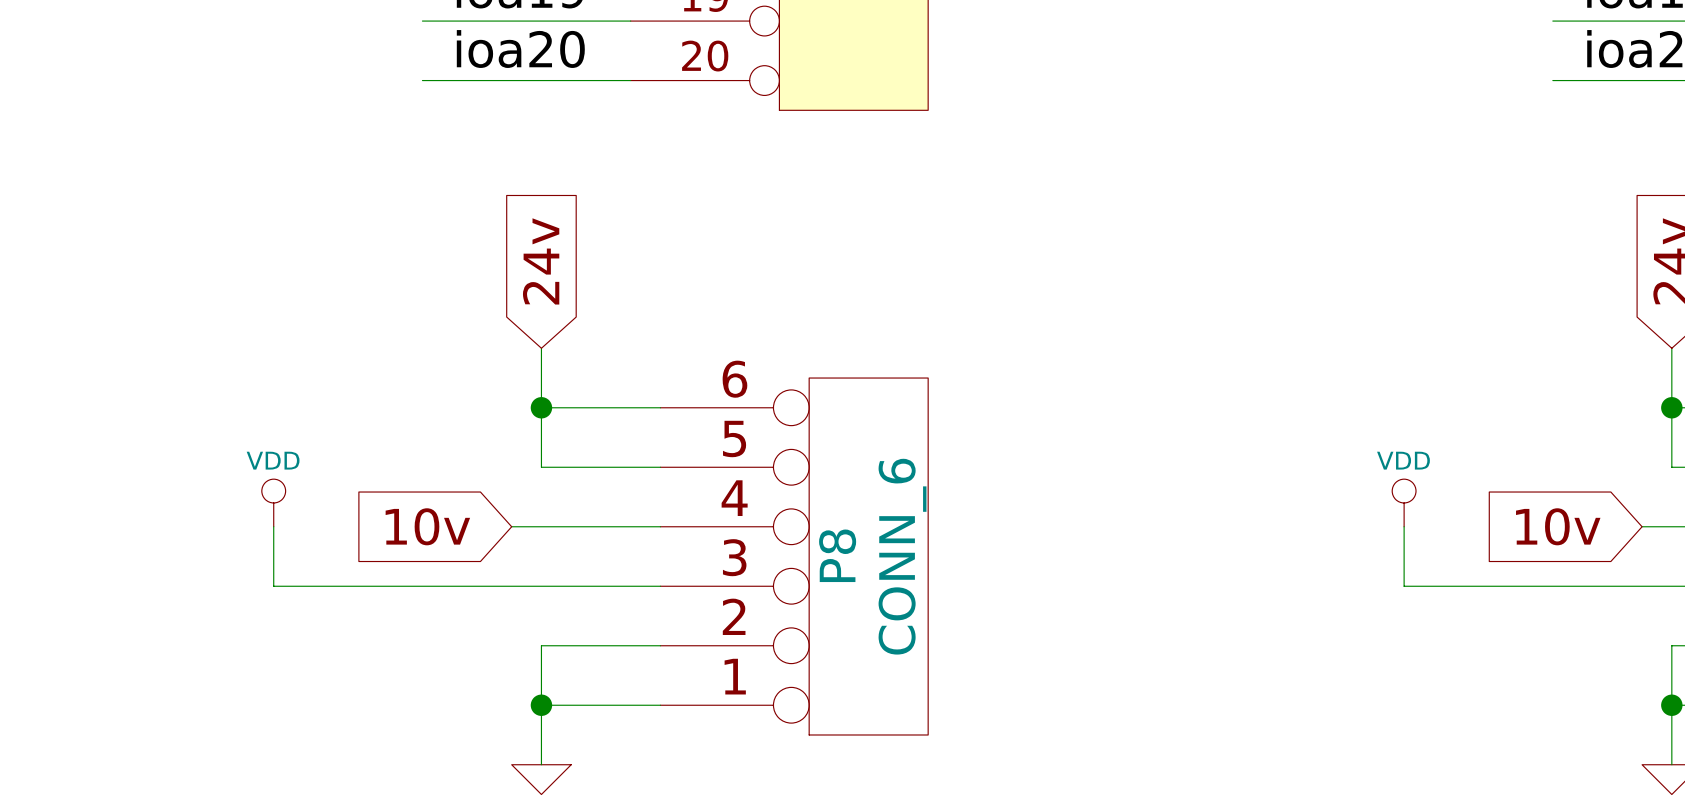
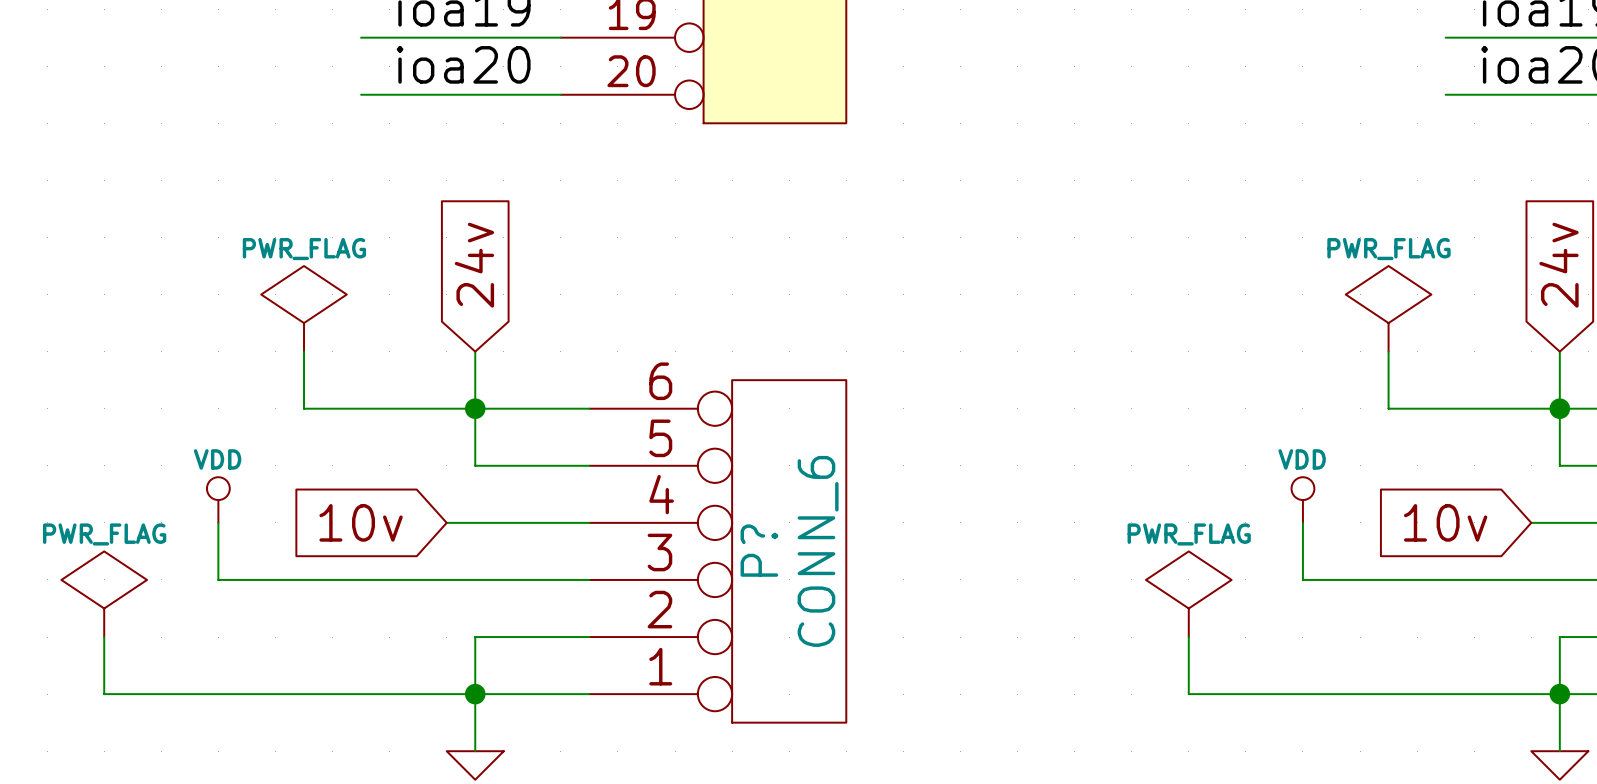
power symbol: none -> PWR_FLAG (304, 308)
power symbol: none -> PWR_FLAG (1388, 308)
wire: none -> (304, 351) (304, 408) (475, 408)
wire: none -> (1388, 351) (1388, 408) (1559, 408)
P8 name: P8 (837, 555) -> P? (759, 550)
power symbol: none -> PWR_FLAG (104, 594)
power symbol: none -> PWR_FLAG (1188, 594)
wire: none -> (104, 637) (104, 694) (475, 694)
wire: none -> (1188, 637) (1188, 694) (1559, 694)

